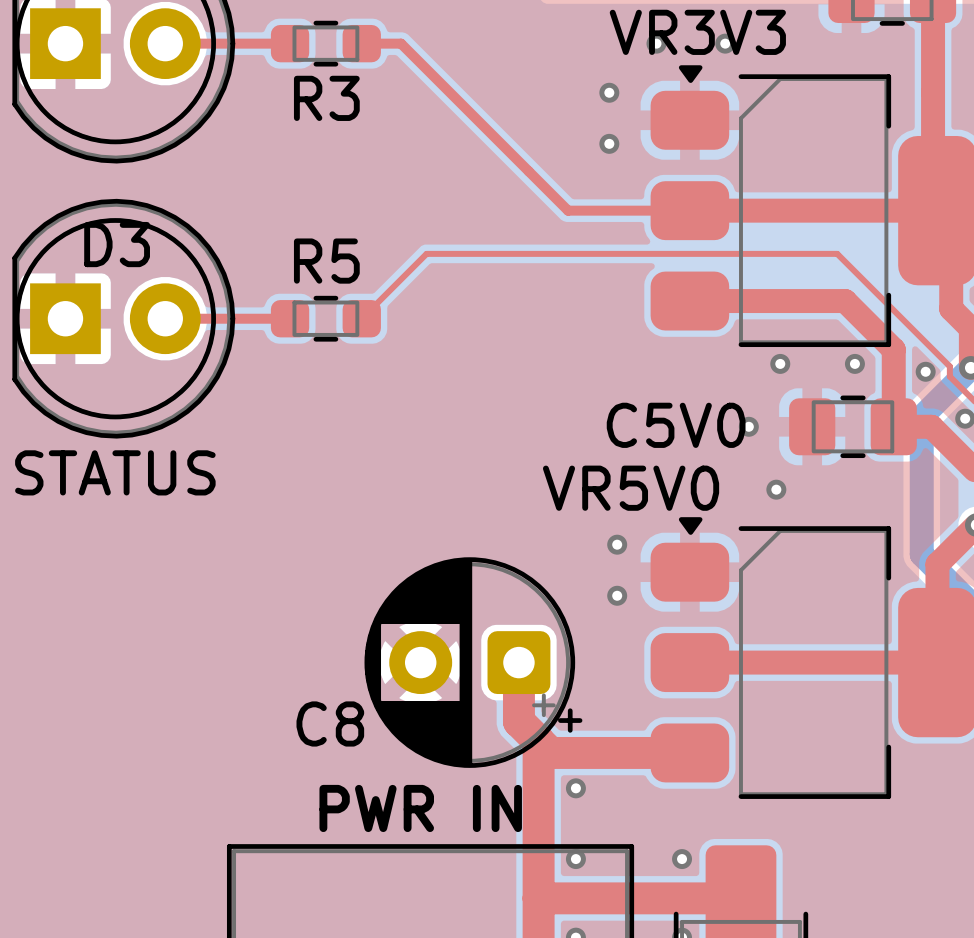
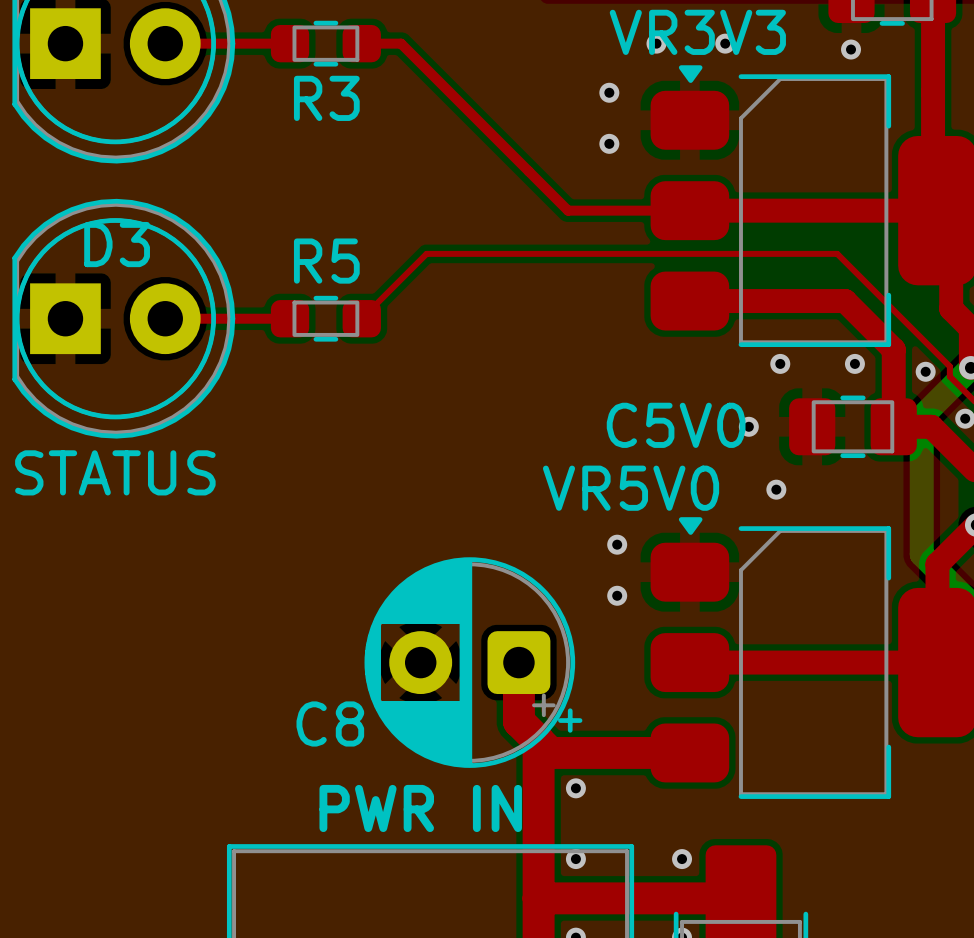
via: none -> (851, 49)

